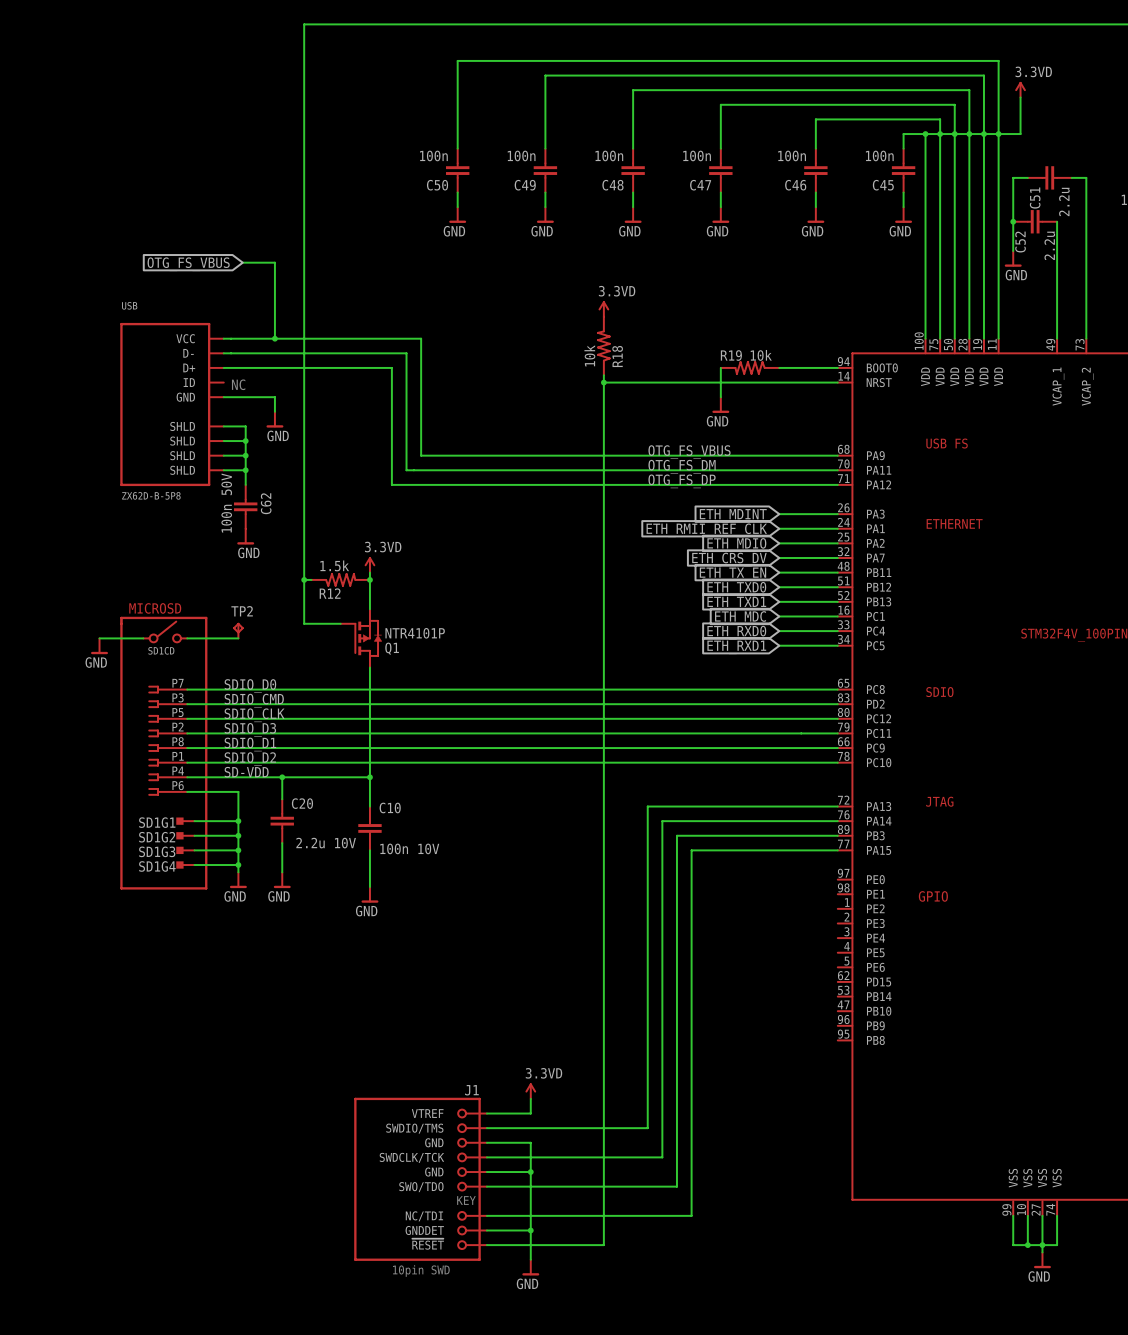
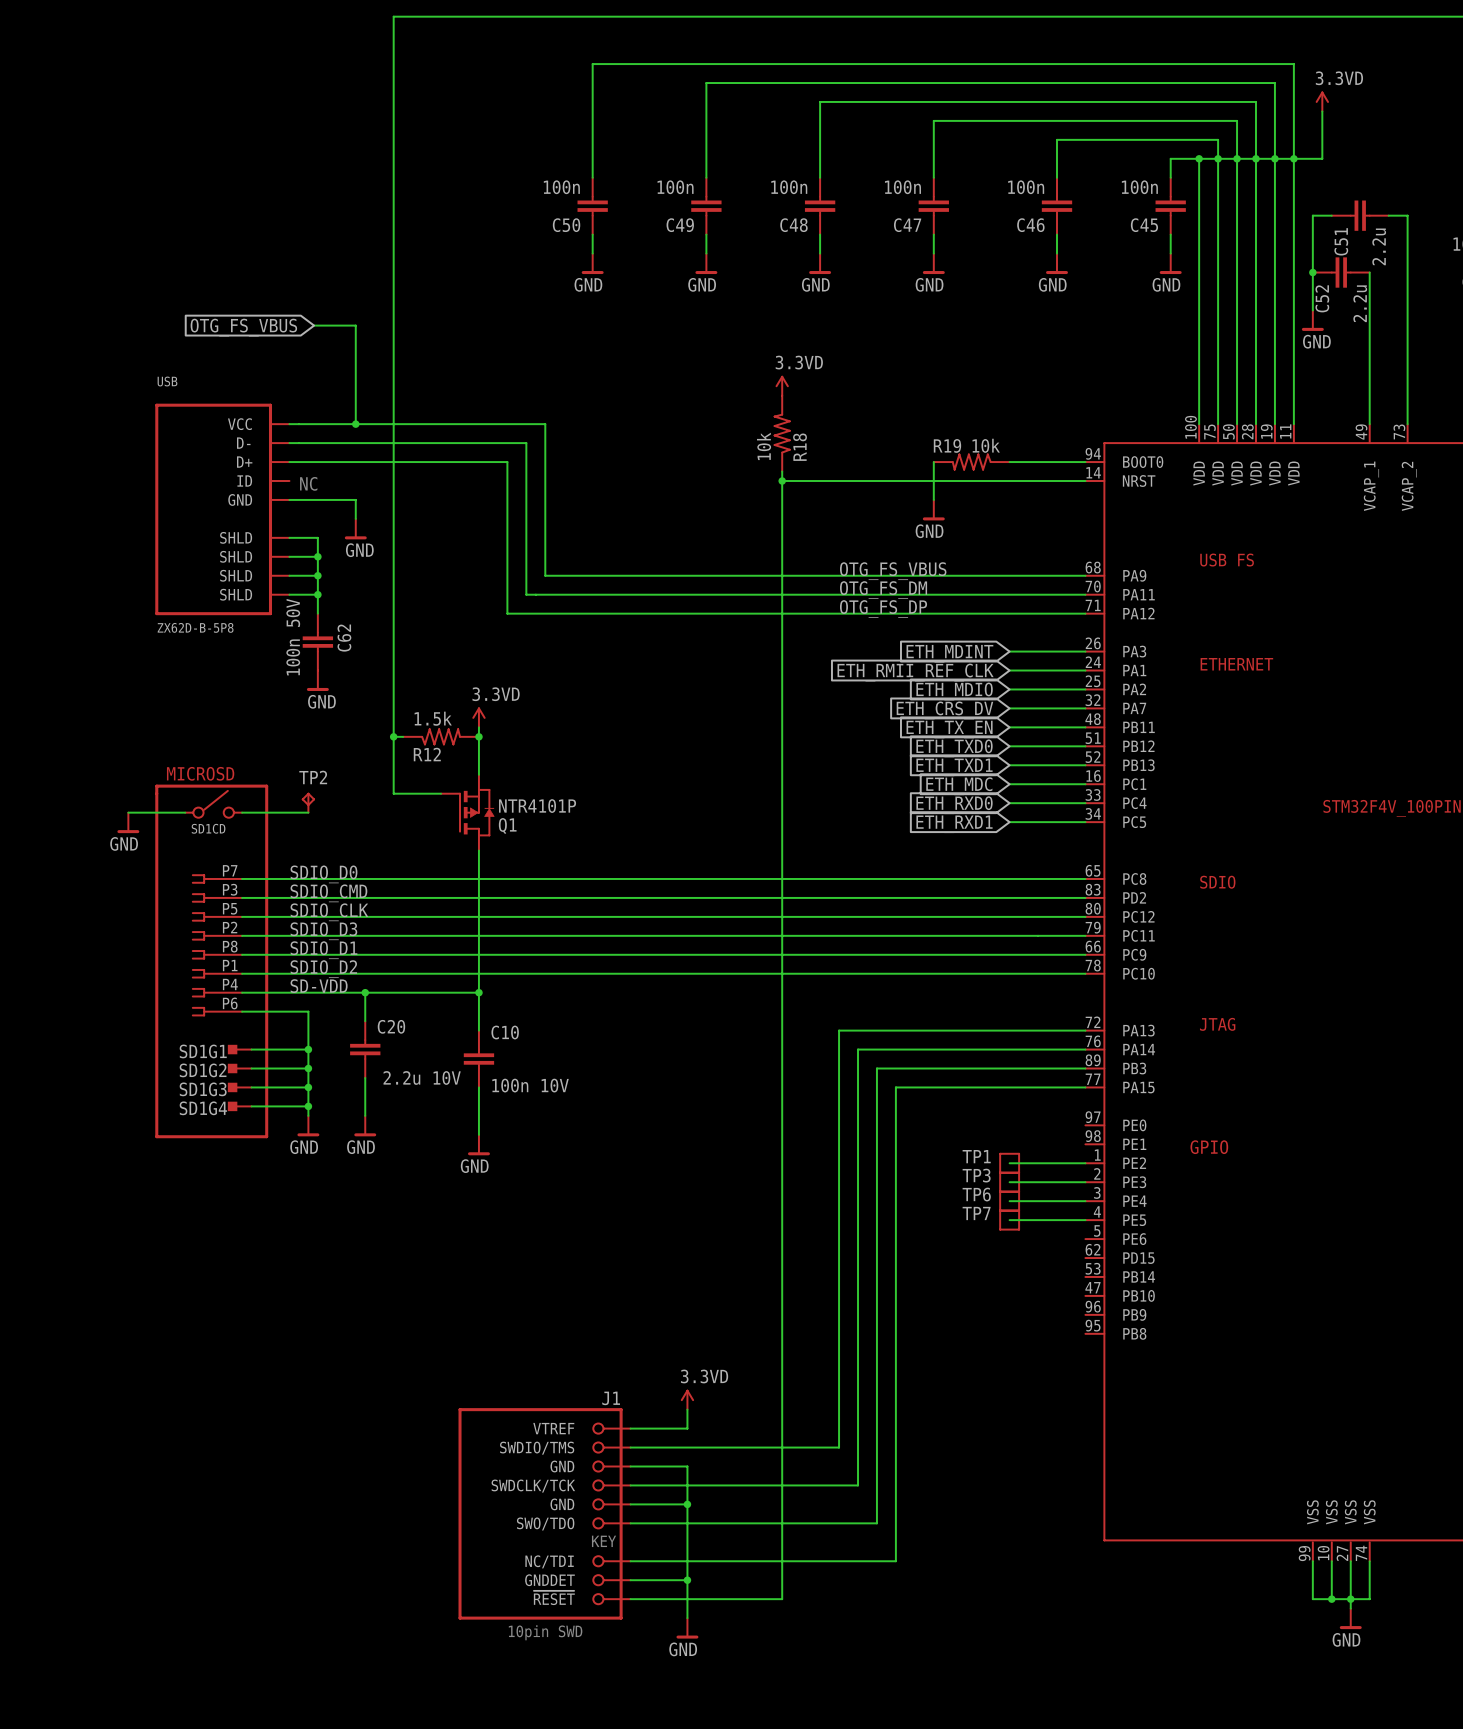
wire: none -> (1009, 1163) (1085, 1163)
TP1: none -> (1009, 1163)
wire: none -> (1009, 1182) (1085, 1182)
TP3: none -> (1009, 1182)
wire: none -> (1009, 1201) (1085, 1201)
TP6: none -> (1009, 1201)
wire: none -> (1009, 1220) (1085, 1220)
TP7: none -> (1009, 1220)

